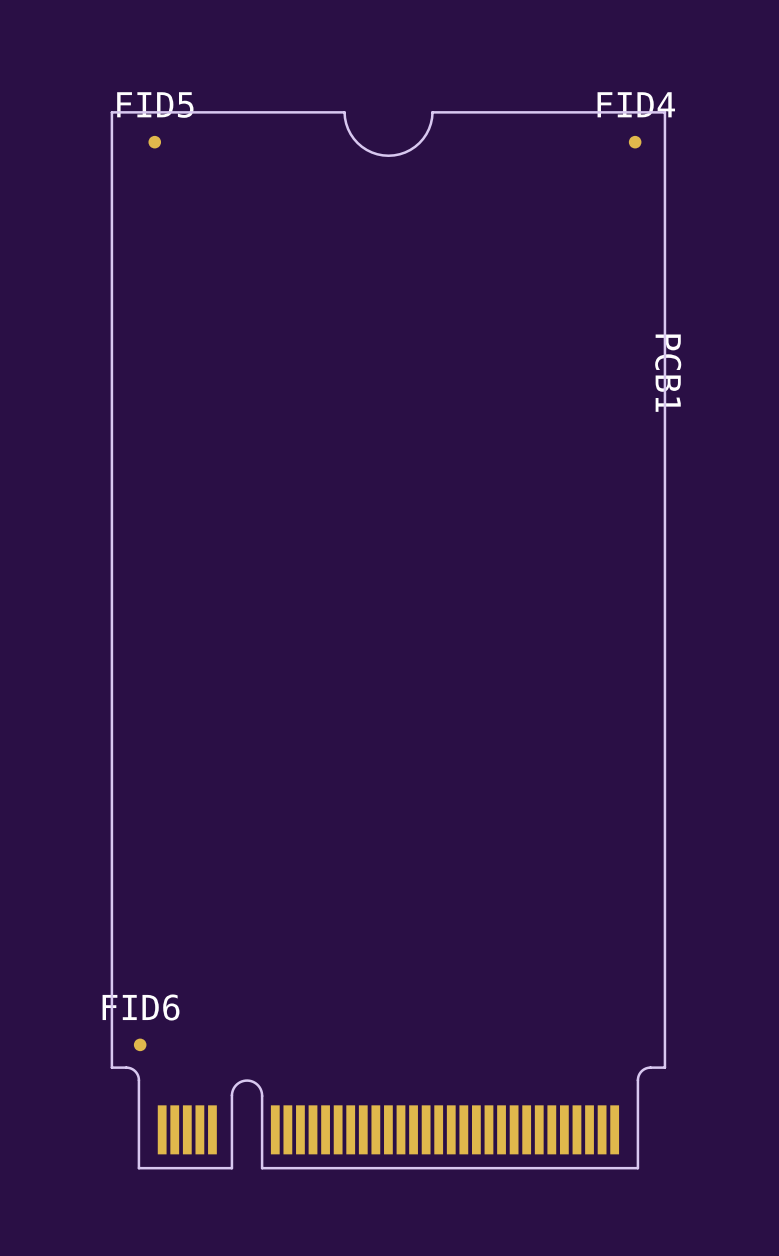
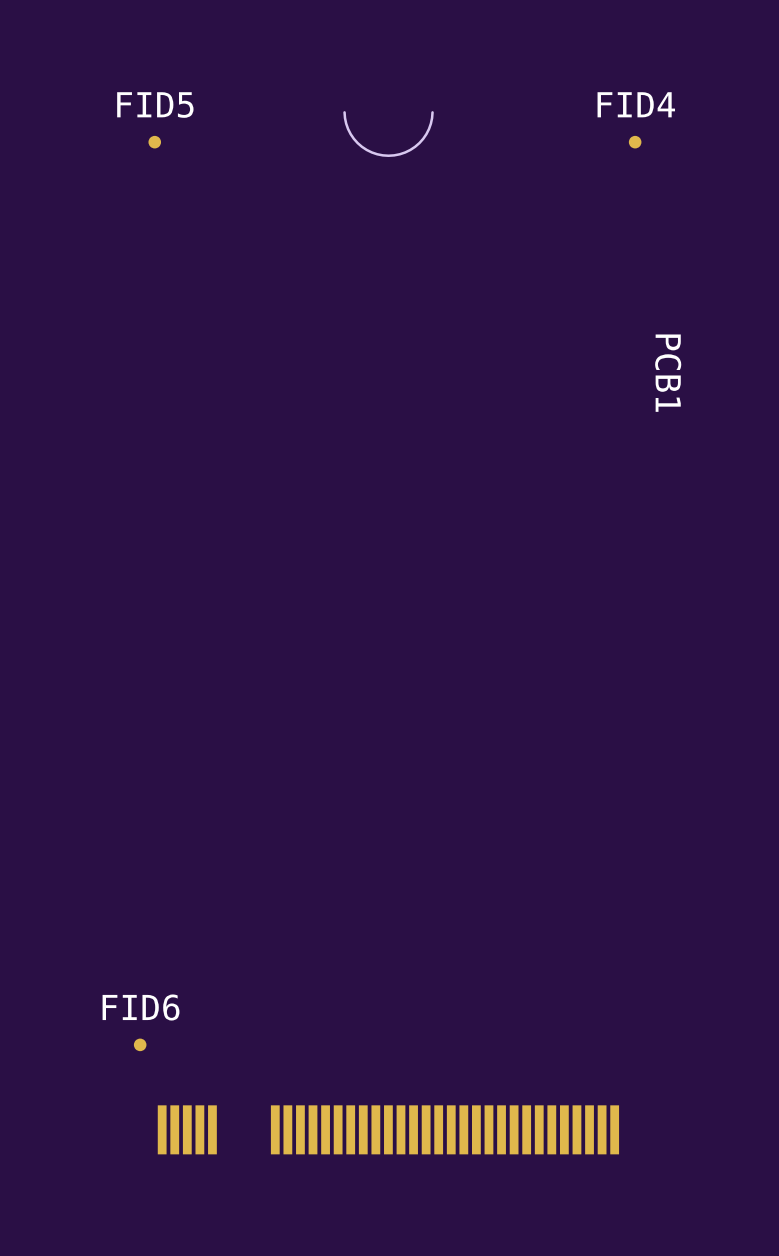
board edge: (432, 112) (664, 112) (664, 1067) (645, 1068) (638, 1076) (637, 1168) (262, 1168) (261, 1092) (257, 1084) (247, 1080) (237, 1084) (232, 1093) (231, 1168) (138, 1168) (138, 1076) (131, 1068) (111, 1067) (111, 112) (344, 112) -> none

